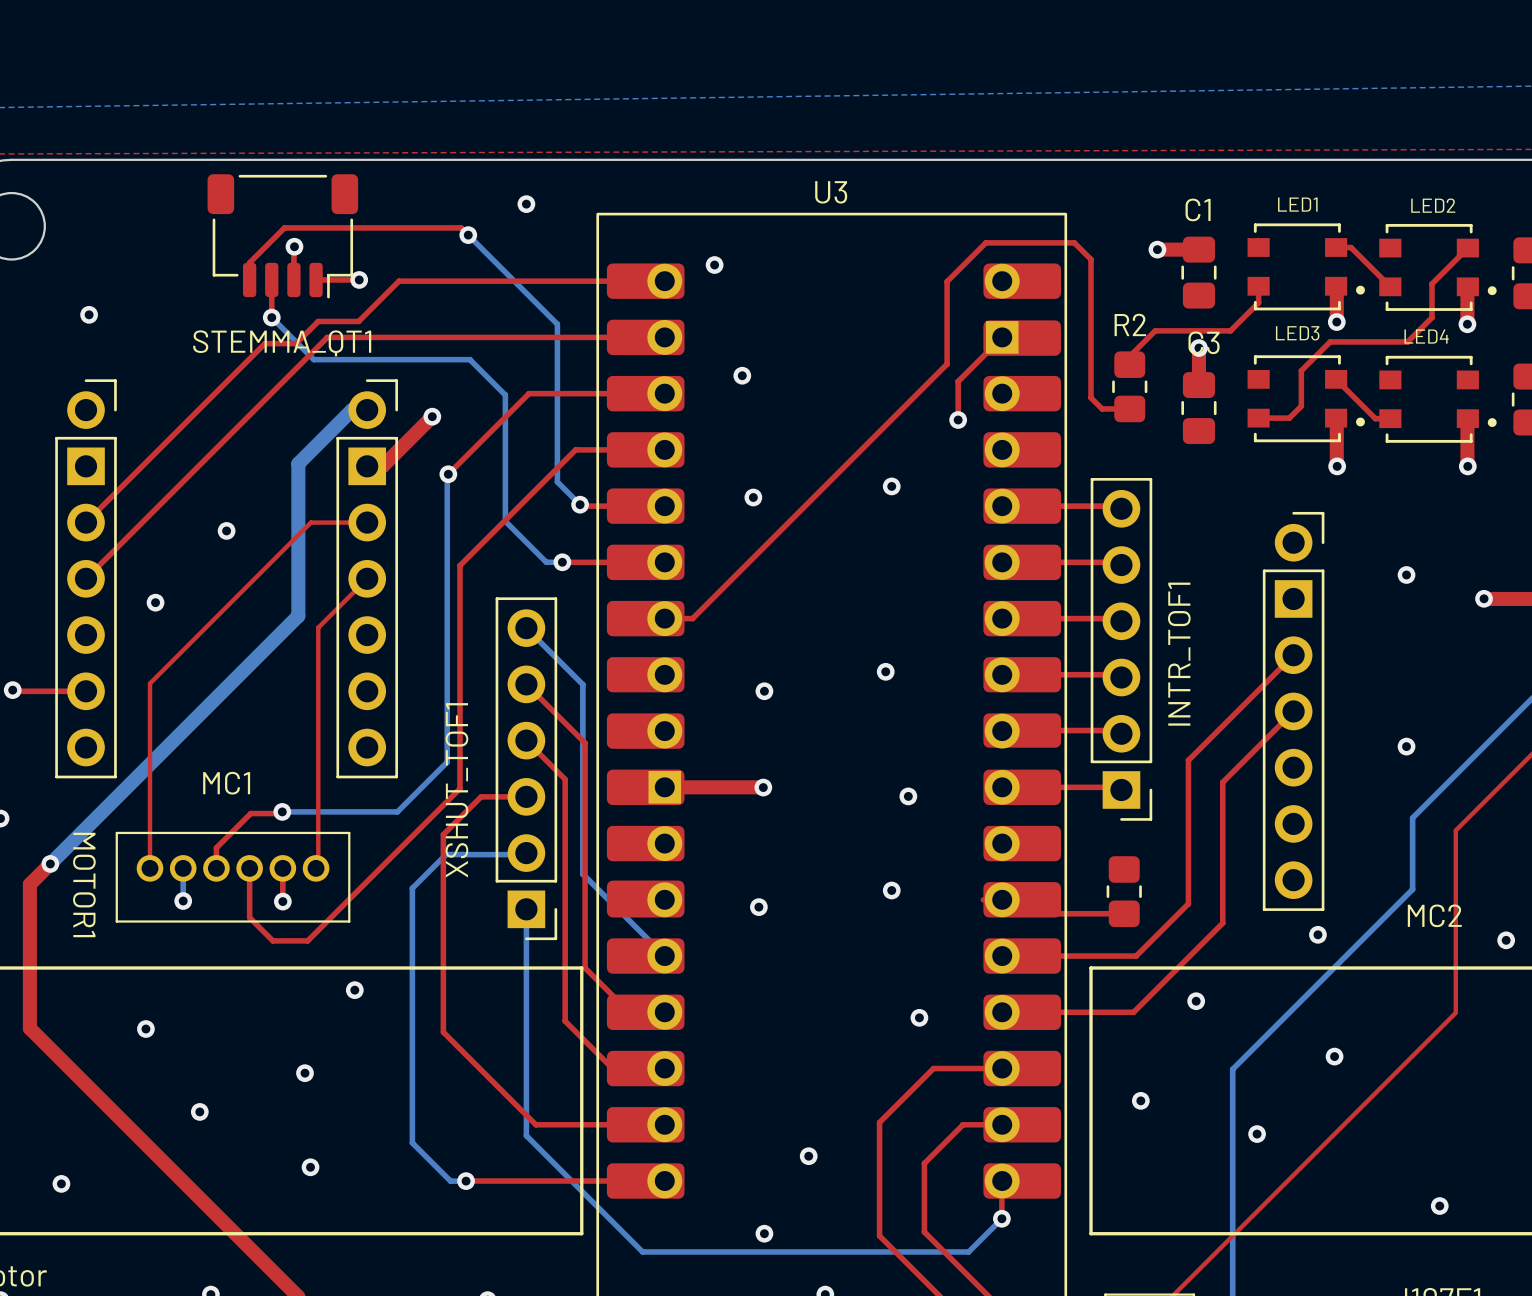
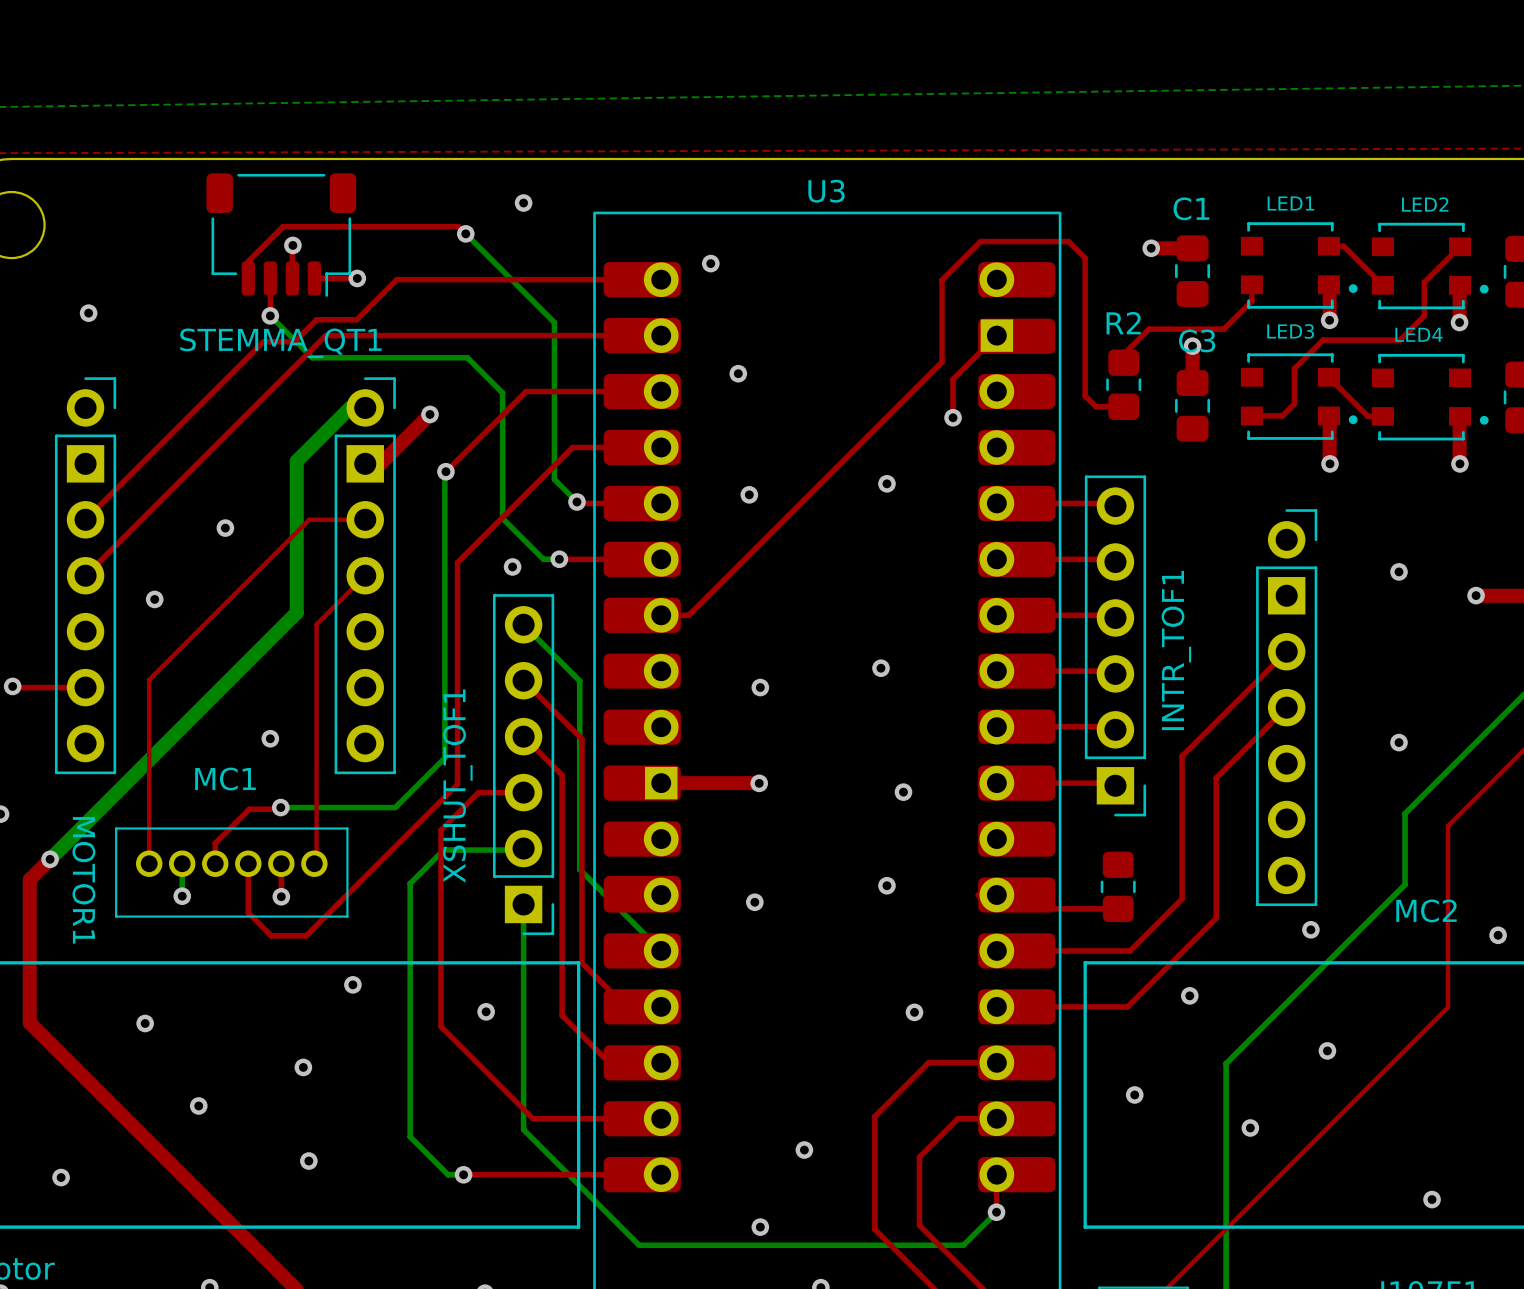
via: none -> (512, 566)
via: none -> (270, 738)
via: none -> (486, 1011)

